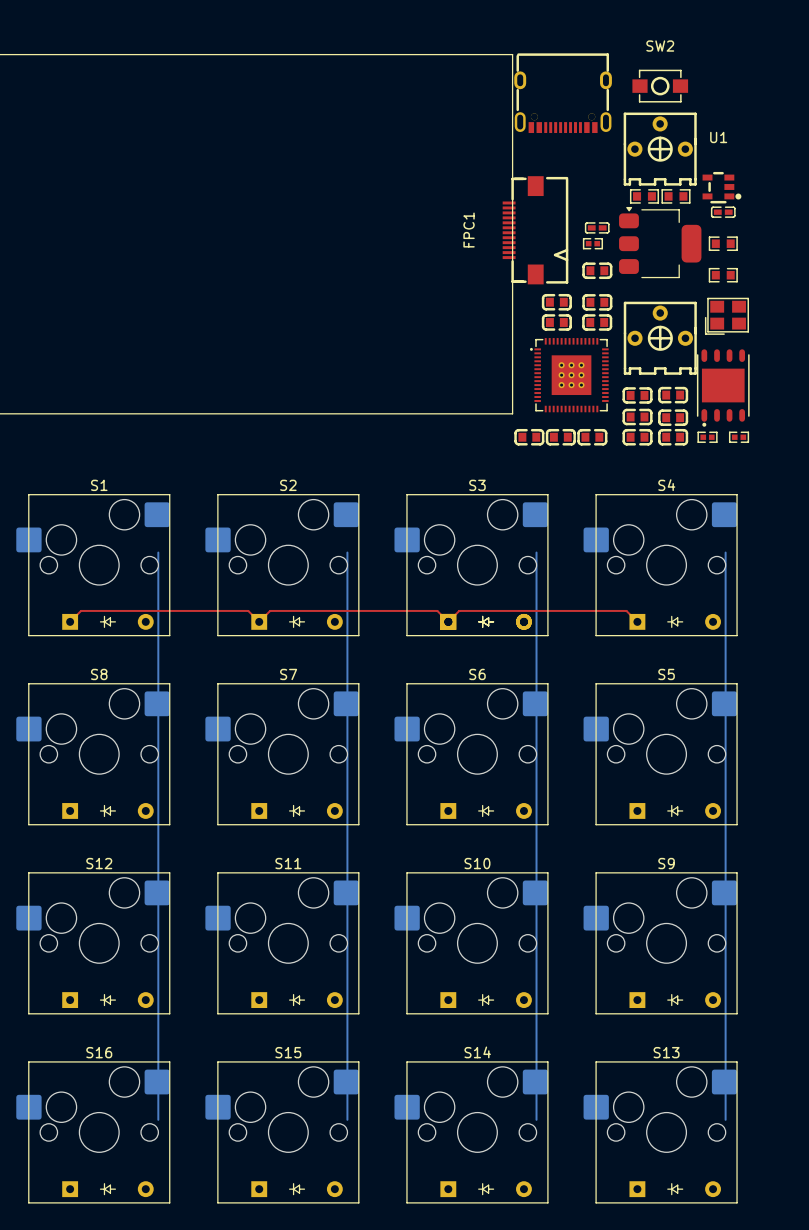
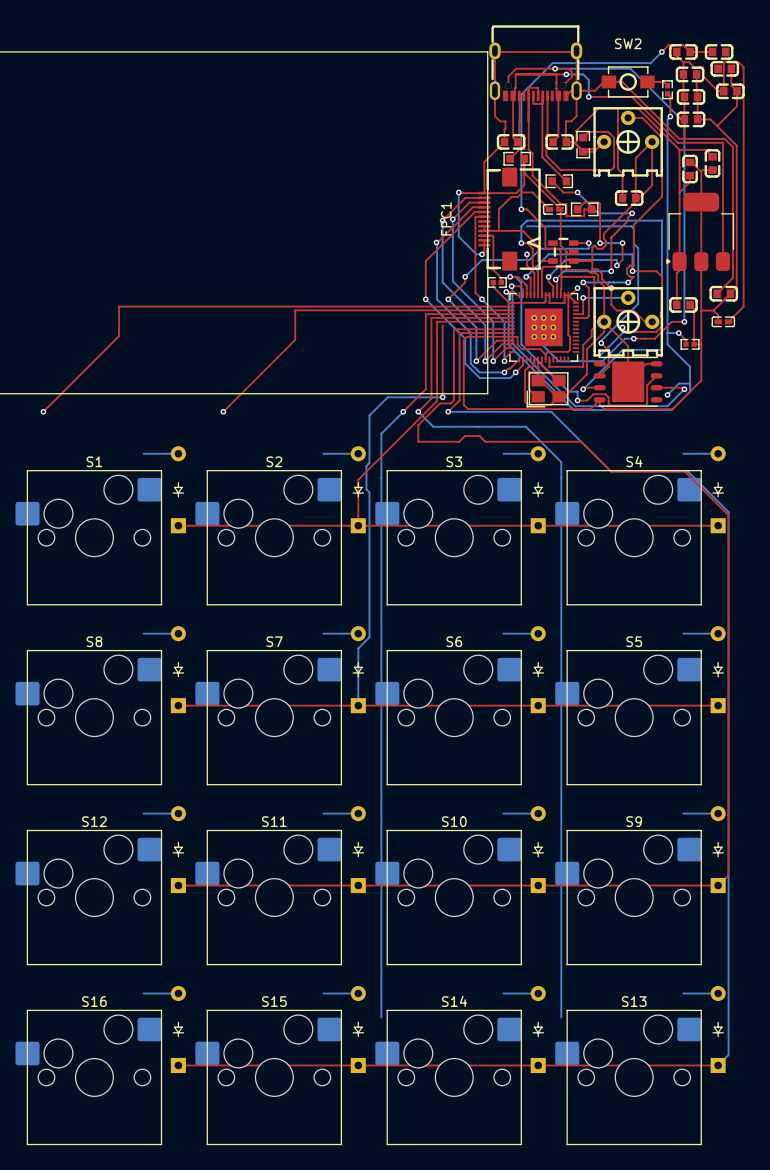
top track: none -> (661, 51) (669, 44) (682, 44) (690, 51) (712, 51)
bottom track: none -> (661, 51) (650, 63) (552, 63) (521, 94) (521, 209)
via: none -> (661, 51)
top track: none -> (676, 51) (676, 55) (683, 62)
part: none -> (683, 51)
part: none -> (719, 51)
top track: none -> (683, 62) (684, 138)
top track: none -> (683, 62) (689, 62) (694, 67) (703, 67) (703, 76) (718, 91) (723, 91) (724, 61) (737, 61) (743, 67) (743, 306) (728, 321)
bottom track: none -> (555, 68) (630, 68) (684, 122) (684, 321)
via: none -> (555, 68)
part: none -> (724, 68)
top track: none -> (731, 68) (731, 85) (737, 91) (737, 106) (717, 126)
top track: none -> (556, 74) (556, 82)
top track: none -> (566, 74) (515, 74) (515, 87) (513, 95) (513, 137) (517, 141)
bottom track: none -> (566, 74) (583, 74) (588, 80) (588, 96)
via: none -> (566, 74)
part: none -> (690, 74)
top track: none -> (696, 74) (697, 119) (710, 119) (736, 145) (736, 287) (713, 310)
top track: none -> (647, 81) (663, 81) (667, 85)
top track: none -> (556, 82) (556, 88)
top track: none -> (508, 85) (508, 76) (516, 68) (568, 68) (572, 72) (572, 76) (563, 85)
part position: (563, 93) -> (535, 63)
top track: none -> (556, 88) (558, 95) (558, 136) (553, 141)
part: none -> (667, 89)
part: none -> (730, 91)
top track: none -> (667, 93) (670, 96) (670, 116)
top track: none -> (533, 95) (533, 103) (542, 103) (542, 103) (542, 95) (542, 96) (542, 157) (566, 181)
top track: none -> (538, 95) (537, 87) (528, 88) (528, 149) (532, 153) (532, 175) (560, 203) (566, 203) (566, 216) (584, 216) (584, 209) (591, 209)
top track: none -> (547, 95) (546, 155) (560, 170) (611, 170) (614, 167) (614, 137) (608, 131) (588, 131) (583, 137)
top track: none -> (565, 95) (571, 90) (595, 90) (603, 81) (622, 81) (679, 138) (724, 138) (732, 147) (732, 277) (717, 293)
top track: none -> (588, 96) (631, 96) (677, 142) (723, 142) (723, 261)
via: none -> (588, 96)
part: none -> (691, 96)
top track: none -> (519, 100) (519, 134) (524, 134) (524, 148) (519, 148) (510, 158)
top track: none -> (616, 107) (617, 169) (622, 173) (622, 198)
bottom track: none -> (670, 116) (667, 119) (667, 344) (690, 366) (690, 391) (671, 409) (573, 409) (508, 345) (508, 294) (506, 291)
via: none -> (670, 116)
top track: none -> (628, 117) (642, 117) (662, 137) (662, 196) (633, 224) (633, 265) (630, 265) (626, 268) (626, 273) (630, 276) (633, 276) (628, 282)
part: none -> (691, 119)
part: none -> (511, 141)
part: none -> (559, 141)
top track: none -> (604, 141) (594, 151) (583, 151) (573, 141) (565, 141) (565, 121) (571, 121) (576, 116) (576, 51) (494, 51) (494, 116) (500, 121) (505, 121) (505, 128) (504, 141) (484, 162) (484, 193)
part: none -> (583, 144)
top track: none -> (596, 149) (581, 149) (576, 144) (576, 130) (599, 107) (637, 107) (679, 149)
top track: none -> (679, 149) (679, 270) (676, 273) (676, 304)
top track: none -> (679, 149) (705, 149) (712, 156)
part: none -> (517, 158)
top track: none -> (524, 158) (524, 185) (516, 193) (458, 192)
top track: none -> (690, 162) (701, 171)
part: none -> (712, 163)
part: none -> (690, 169)
top track: none -> (712, 170) (701, 171)
top track: none -> (701, 171) (701, 380) (672, 409) (604, 409) (599, 404) (599, 399) (590, 409) (468, 409) (463, 404) (463, 340) (467, 336) (517, 336) (517, 344) (522, 349) (540, 349) (545, 354)
top track: none -> (524, 172) (560, 210) (560, 245) (567, 252) (566, 269) (587, 269) (590, 273) (596, 273) (598, 275) (597, 280) (604, 286) (604, 332) (587, 349) (587, 374) (564, 396) (556, 396) (540, 380) (538, 380)
top track: none -> (690, 175) (690, 182) (679, 192)
U1: (721, 187) -> none
top track: none -> (552, 181) (563, 192) (577, 192)
part: none -> (559, 181)
part: (644, 196) -> none
part: (676, 196) -> none
bottom track: none -> (458, 192) (458, 236) (476, 254) (482, 254)
via: none -> (458, 192)
bottom track: none -> (577, 192) (598, 213) (632, 213)
via: none -> (577, 192)
top track: none -> (484, 197) (465, 197) (442, 220)
part: none -> (629, 198)
top track: none -> (635, 198) (635, 158) (652, 141) (652, 185) (603, 233) (605, 245) (602, 248) (597, 248) (594, 245) (592, 247) (592, 269) (597, 269) (602, 273) (602, 279) (607, 285) (607, 288) (611, 288) (611, 304) (616, 310) (633, 310) (645, 321) (652, 321)
top track: none -> (484, 202) (469, 202) (452, 219)
part: (723, 212) -> none
top track: none -> (484, 207) (472, 207) (436, 242)
top track: none -> (521, 209) (526, 209) (545, 227) (545, 248) (558, 248) (560, 251) (559, 266)
via: none -> (521, 209)
top track: none -> (549, 209) (532, 192) (522, 192) (517, 196) (511, 196) (498, 209) (498, 230)
top track: none -> (577, 209) (584, 202) (600, 204) (600, 243)
part: none -> (584, 209)
top track: none -> (484, 212) (474, 212) (425, 261) (425, 299)
top track: none -> (632, 213) (628, 217) (628, 220) (611, 237) (611, 271)
via: none -> (632, 213)
top track: none -> (484, 216) (475, 217) (475, 292) (482, 299)
part position: (597, 227) -> (554, 209)
bottom track: none -> (452, 219) (452, 281) (493, 321) (493, 361)
via: none -> (452, 219)
bottom track: none -> (442, 220) (442, 282) (485, 325) (485, 361)
via: none -> (442, 220)
top track: none -> (484, 226) (484, 230) (522, 230) (538, 246) (538, 261) (552, 261)
bottom track: none -> (527, 226) (631, 226)
bottom track: none -> (631, 226) (633, 228) (633, 243) (638, 248) (638, 303) (601, 340) (602, 344)
part rotation: 0° (660, 242) -> 90° counterclockwise (700, 231)
part position: (660, 242) -> (700, 231)
part position: (592, 243) -> (497, 282)
part: (723, 243) -> none
top track: none -> (484, 235) (493, 236) (493, 270) (501, 278) (501, 282)
top track: none -> (484, 240) (484, 251) (482, 254)
bottom track: none -> (436, 242) (437, 299) (470, 333) (470, 363) (479, 372) (504, 372)
via: none -> (436, 242)
top track: none -> (521, 243) (526, 243) (532, 248) (532, 265) (538, 271) (538, 295)
bottom track: none -> (521, 243) (521, 226) (526, 220) (661, 220) (662, 349) (622, 349) (583, 389)
via: none -> (521, 243)
top track: none -> (573, 243) (588, 243)
bottom track: none -> (588, 243) (588, 248) (540, 248) (529, 260) (481, 260) (465, 276)
via: none -> (588, 243)
bottom track: none -> (600, 243) (622, 243)
via: none -> (600, 243)
top track: none -> (622, 243) (622, 259) (616, 265)
via: none -> (622, 243)
part footprint: [582, 262, 613, 280] -> [548, 237, 579, 268]
via: none -> (482, 254)
top track: none -> (526, 254) (526, 265) (534, 272) (534, 295)
via: none -> (526, 254)
top track: none -> (573, 261) (592, 261)
part: (723, 275) -> none
bottom track: none -> (616, 265) (616, 259) (565, 259) (548, 276)
via: none -> (616, 265)
top track: none -> (559, 266) (543, 266) (541, 268) (541, 295)
top track: none -> (559, 266) (561, 268) (560, 295)
bottom track: none -> (611, 271) (564, 271) (555, 279)
via: none -> (611, 271)
top track: none -> (632, 271) (656, 271) (662, 276) (662, 326) (656, 331) (627, 331) (622, 327)
bottom track: none -> (632, 271) (632, 254) (548, 254) (526, 276)
via: none -> (632, 271)
top track: none -> (465, 276) (465, 282) (448, 299)
via: none -> (465, 276)
top track: none -> (510, 276) (518, 276) (526, 285) (526, 295)
bottom track: none -> (510, 276) (515, 276) (521, 282) (521, 344) (568, 391) (577, 391)
via: none -> (510, 276)
top track: none -> (526, 276) (530, 278) (530, 295)
via: none -> (526, 276)
top track: none -> (548, 276) (548, 281) (553, 286) (553, 295)
via: none -> (548, 276)
top track: none -> (561, 277) (594, 276) (594, 327) (591, 329) (591, 336) (583, 344) (583, 366) (549, 366)
top track: none -> (555, 279) (557, 295)
via: none -> (555, 279)
top track: none -> (493, 282) (493, 286) (509, 302) (543, 302) (545, 295) (549, 295) (549, 303) (564, 303)
top track: none -> (583, 282) (588, 288) (588, 316) (575, 317)
bottom track: none -> (583, 282) (608, 282)
via: none -> (583, 282)
bottom track: none -> (608, 282) (613, 282)
bottom track: none -> (613, 282) (628, 282)
via: none -> (628, 282)
part footprint: [704, 297, 750, 335] -> [669, 297, 698, 313]
top track: none -> (511, 286) (519, 286) (523, 289) (523, 295)
bottom track: none -> (511, 286) (512, 343) (575, 406) (667, 406) (684, 389)
via: none -> (511, 286)
part: (556, 302) -> none
part: (597, 302) -> none
top track: none -> (577, 288) (570, 295) (564, 295) (564, 302)
via: none -> (577, 288)
via: none -> (611, 288)
top track: none -> (506, 291) (513, 291) (519, 295)
via: none -> (506, 291)
part: none -> (723, 293)
top track: none -> (583, 297) (583, 314) (575, 314)
bottom track: none -> (583, 297) (628, 297)
via: none -> (583, 297)
bottom track: none -> (425, 299) (465, 338) (465, 363) (479, 378) (510, 378) (515, 372)
via: none -> (425, 299)
bottom track: none -> (448, 299) (476, 327) (476, 361)
via: none -> (448, 299)
bottom track: none -> (482, 299) (504, 321) (504, 361)
via: none -> (482, 299)
top track: none -> (575, 302) (568, 295) (570, 349) (568, 351) (547, 351) (545, 359)
top track: none -> (690, 304) (694, 309) (694, 344) (701, 344)
top track: none -> (511, 306) (119, 306) (119, 336) (43, 411)
part: (556, 322) -> none
part: (597, 322) -> none
top track: none -> (511, 310) (295, 310) (295, 339) (223, 411)
top track: none -> (701, 310) (713, 310)
top track: none -> (713, 310) (718, 315) (718, 321)
top track: none -> (511, 314) (425, 314) (425, 389) (403, 411)
top track: none -> (511, 317) (431, 317) (431, 398) (418, 411)
top track: none -> (511, 321) (437, 321) (437, 401) (358, 479) (358, 525)
top track: none -> (604, 321) (628, 345) (628, 381) (646, 363) (656, 363)
top track: none -> (684, 321) (671, 321) (654, 338) (633, 338)
via: none -> (684, 321)
part: none -> (723, 321)
top track: none -> (442, 325) (442, 397)
part: none -> (543, 327)
bottom track: none -> (622, 327) (622, 333) (600, 355)
via: none -> (622, 327)
top track: none -> (511, 329) (453, 329) (453, 400) (450, 403) (439, 403) (418, 425) (418, 441) (459, 441) (464, 436) (479, 436) (485, 441) (581, 441) (611, 471) (684, 471) (728, 515) (728, 875) (718, 885) (178, 885)
top track: none -> (511, 333) (459, 333) (459, 400) (448, 411)
bottom track: none -> (667, 333) (678, 333)
top track: none -> (678, 333) (685, 340) (685, 344)
via: none -> (678, 333)
bottom track: none -> (534, 336) (558, 361) (602, 361) (624, 338) (633, 338)
via: none -> (633, 338)
top track: none -> (511, 340) (496, 340) (476, 361)
top track: none -> (601, 343) (608, 350) (608, 366) (599, 375)
via: none -> (601, 343)
top track: none -> (511, 344) (502, 344) (485, 361)
part: none -> (690, 344)
top track: none -> (511, 348) (506, 348) (493, 361)
top track: none -> (511, 351) (504, 361)
part: (569, 375) -> none
top track: none -> (519, 359) (504, 372)
top track: none -> (523, 359) (523, 365) (515, 372)
top track: none -> (534, 359) (534, 365) (524, 370) (524, 401) (528, 405) (550, 405) (559, 396)
top track: none -> (538, 359) (538, 366)
top track: none -> (541, 359) (541, 365) (559, 380)
top track: none -> (549, 359) (549, 366)
via: none -> (476, 361)
via: none -> (485, 361)
via: none -> (493, 361)
via: none -> (504, 361)
top track: none -> (538, 366) (538, 372) (528, 372) (528, 389) (538, 396)
part: (723, 387) -> none
via: none -> (504, 372)
via: none -> (515, 372)
part: (637, 395) -> none
part: (673, 395) -> none
top track: none -> (656, 375) (647, 385) (646, 405) (609, 405) (608, 397) (605, 394) (593, 394) (587, 400) (577, 400)
part: none -> (628, 381)
bottom track: none -> (690, 383) (678, 383) (667, 394)
top track: none -> (599, 387) (583, 389)
top track: none -> (656, 387) (684, 389)
part: none -> (547, 389)
via: none -> (583, 389)
via: none -> (684, 389)
bottom track: none -> (577, 391) (577, 400)
via: none -> (667, 394)
bottom track: none -> (442, 397) (387, 397) (369, 415) (369, 463) (366, 466) (366, 489) (369, 492) (369, 637) (358, 648) (358, 705)
via: none -> (442, 397)
part: (637, 417) -> none
part: (673, 417) -> none
via: none -> (577, 400)
via: none -> (43, 411)
via: none -> (223, 411)
bottom track: none -> (403, 411) (381, 433) (381, 1017)
via: none -> (403, 411)
bottom track: none -> (418, 411) (433, 426) (525, 426) (561, 462) (561, 1017)
via: none -> (418, 411)
bottom track: none -> (448, 411) (551, 411) (611, 471) (687, 471) (728, 512) (728, 1055) (718, 1065)
via: none -> (448, 411)
part: (529, 437) -> none
part: (560, 437) -> none
part: (592, 437) -> none
part: (637, 437) -> none
part: (673, 437) -> none
part: (707, 437) -> none
part: (739, 437) -> none
bottom track: none -> (143, 453) (178, 453)
bottom track: none -> (323, 453) (358, 453)
bottom track: none -> (503, 453) (538, 453)
bottom track: none -> (683, 453) (718, 453)
part: none -> (178, 489)
part: none -> (358, 489)
part: none -> (538, 489)
part: none -> (718, 489)
bottom track: (158, 552) (158, 1119) -> none
top track: none -> (178, 525) (718, 525)
bottom track: (347, 552) (347, 1119) -> none
bottom track: (536, 552) (536, 1119) -> none
bottom track: (725, 552) (725, 1119) -> none
top track: (70, 621) (81, 610) (248, 610) (259, 621) (270, 610) (437, 610) (448, 621) (459, 610) (626, 610) (637, 621) -> none
part: (107, 621) -> none
part: (297, 621) -> none
part: (486, 621) -> none
part: (675, 621) -> none
bottom track: none -> (143, 633) (178, 633)
bottom track: none -> (323, 633) (358, 633)
bottom track: none -> (503, 633) (538, 633)
bottom track: none -> (683, 633) (718, 633)
part: none -> (178, 669)
part: none -> (358, 669)
part: none -> (538, 669)
part: none -> (718, 669)
top track: none -> (178, 705) (718, 705)
part: (107, 810) -> none
part: (297, 810) -> none
part: (486, 810) -> none
part: (675, 810) -> none
bottom track: none -> (143, 813) (178, 813)
bottom track: none -> (323, 813) (358, 813)
bottom track: none -> (503, 813) (538, 813)
bottom track: none -> (683, 813) (718, 813)
part: none -> (178, 849)
part: none -> (358, 849)
part: none -> (538, 849)
part: none -> (718, 849)
part: (107, 1000) -> none
part: (297, 1000) -> none
part: (486, 1000) -> none
part: (675, 1000) -> none
bottom track: none -> (143, 993) (178, 993)
bottom track: none -> (323, 993) (358, 993)
bottom track: none -> (503, 993) (538, 993)
bottom track: none -> (683, 993) (718, 993)
part: none -> (178, 1029)
part: none -> (358, 1029)
part: none -> (538, 1029)
part: none -> (718, 1029)
top track: none -> (178, 1065) (718, 1065)
part: (107, 1189) -> none
part: (297, 1189) -> none
part: (486, 1189) -> none
part: (675, 1189) -> none

